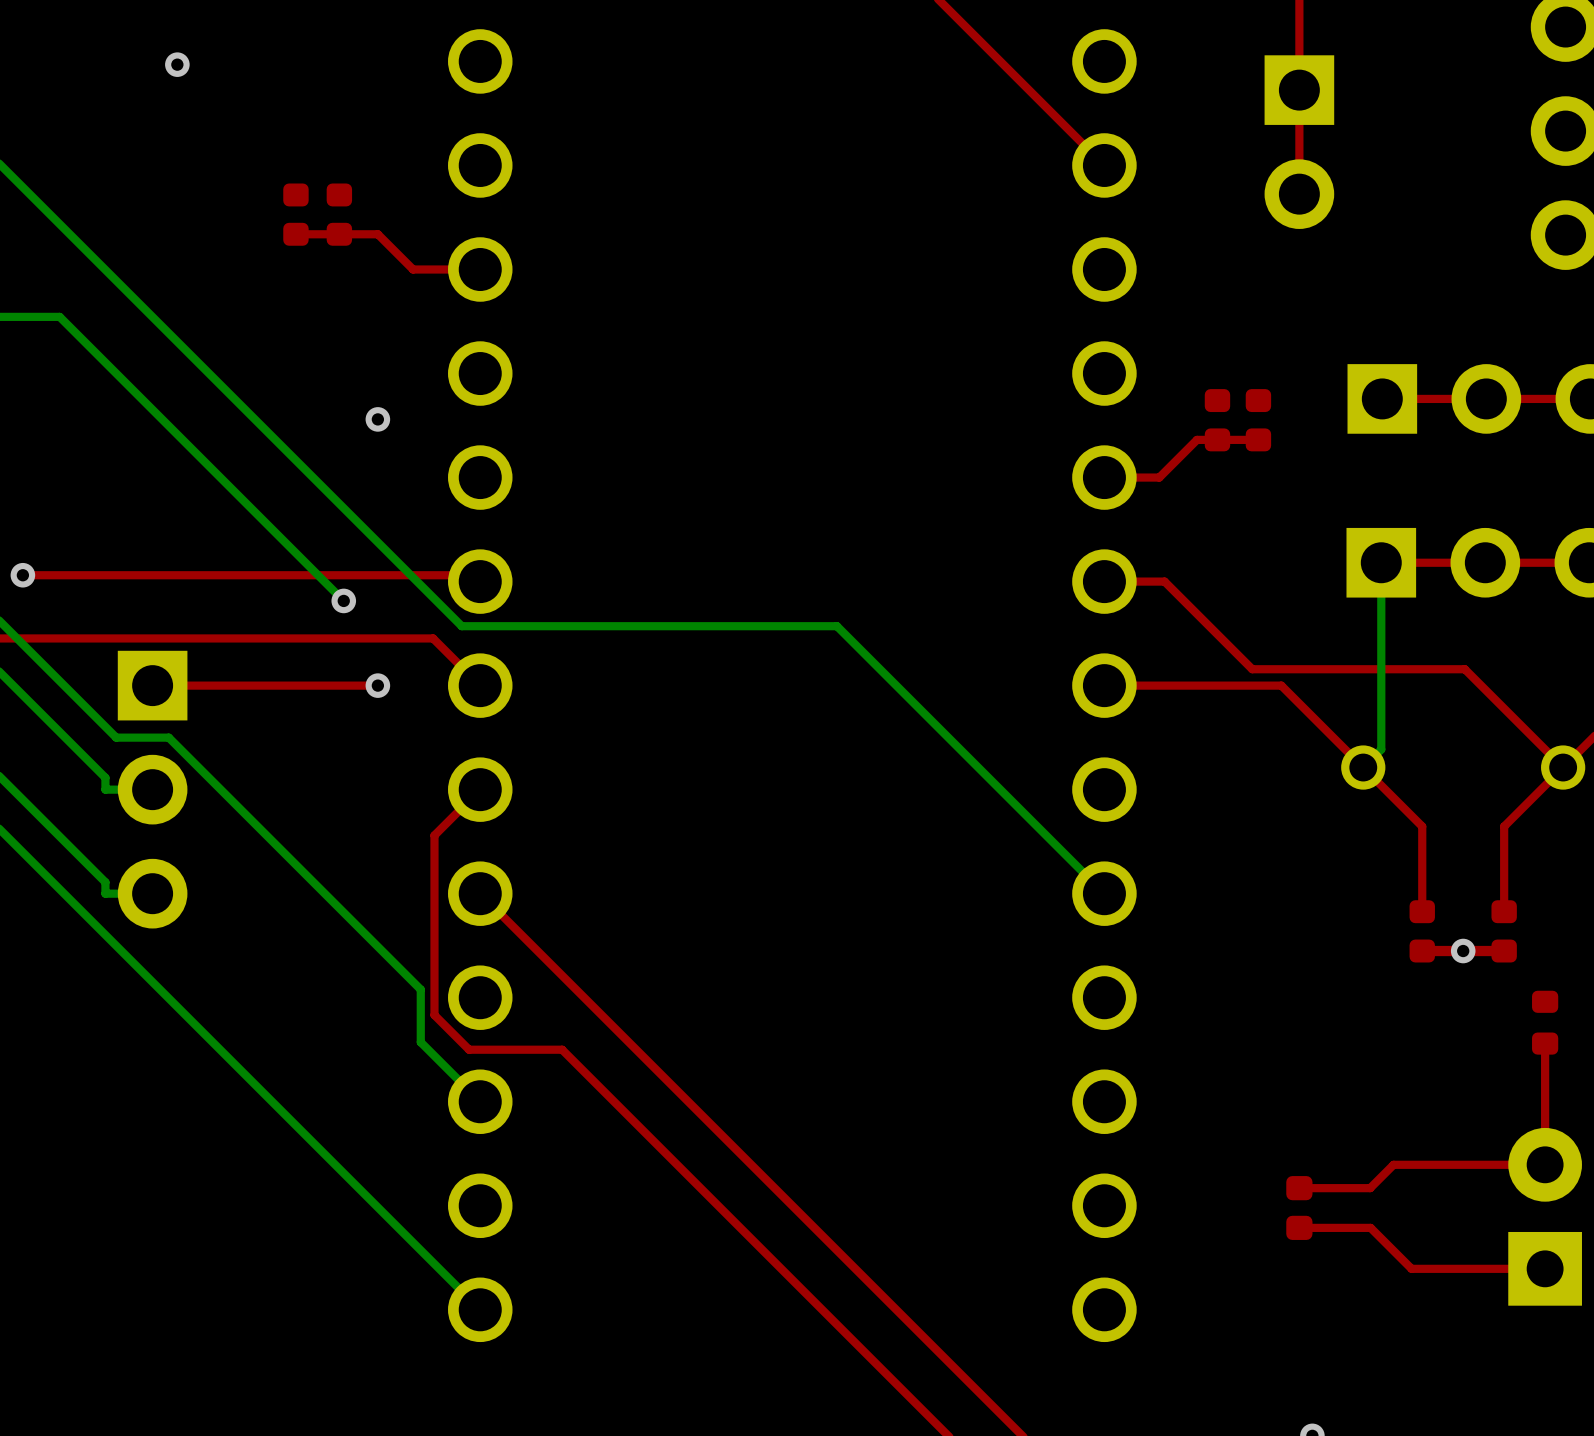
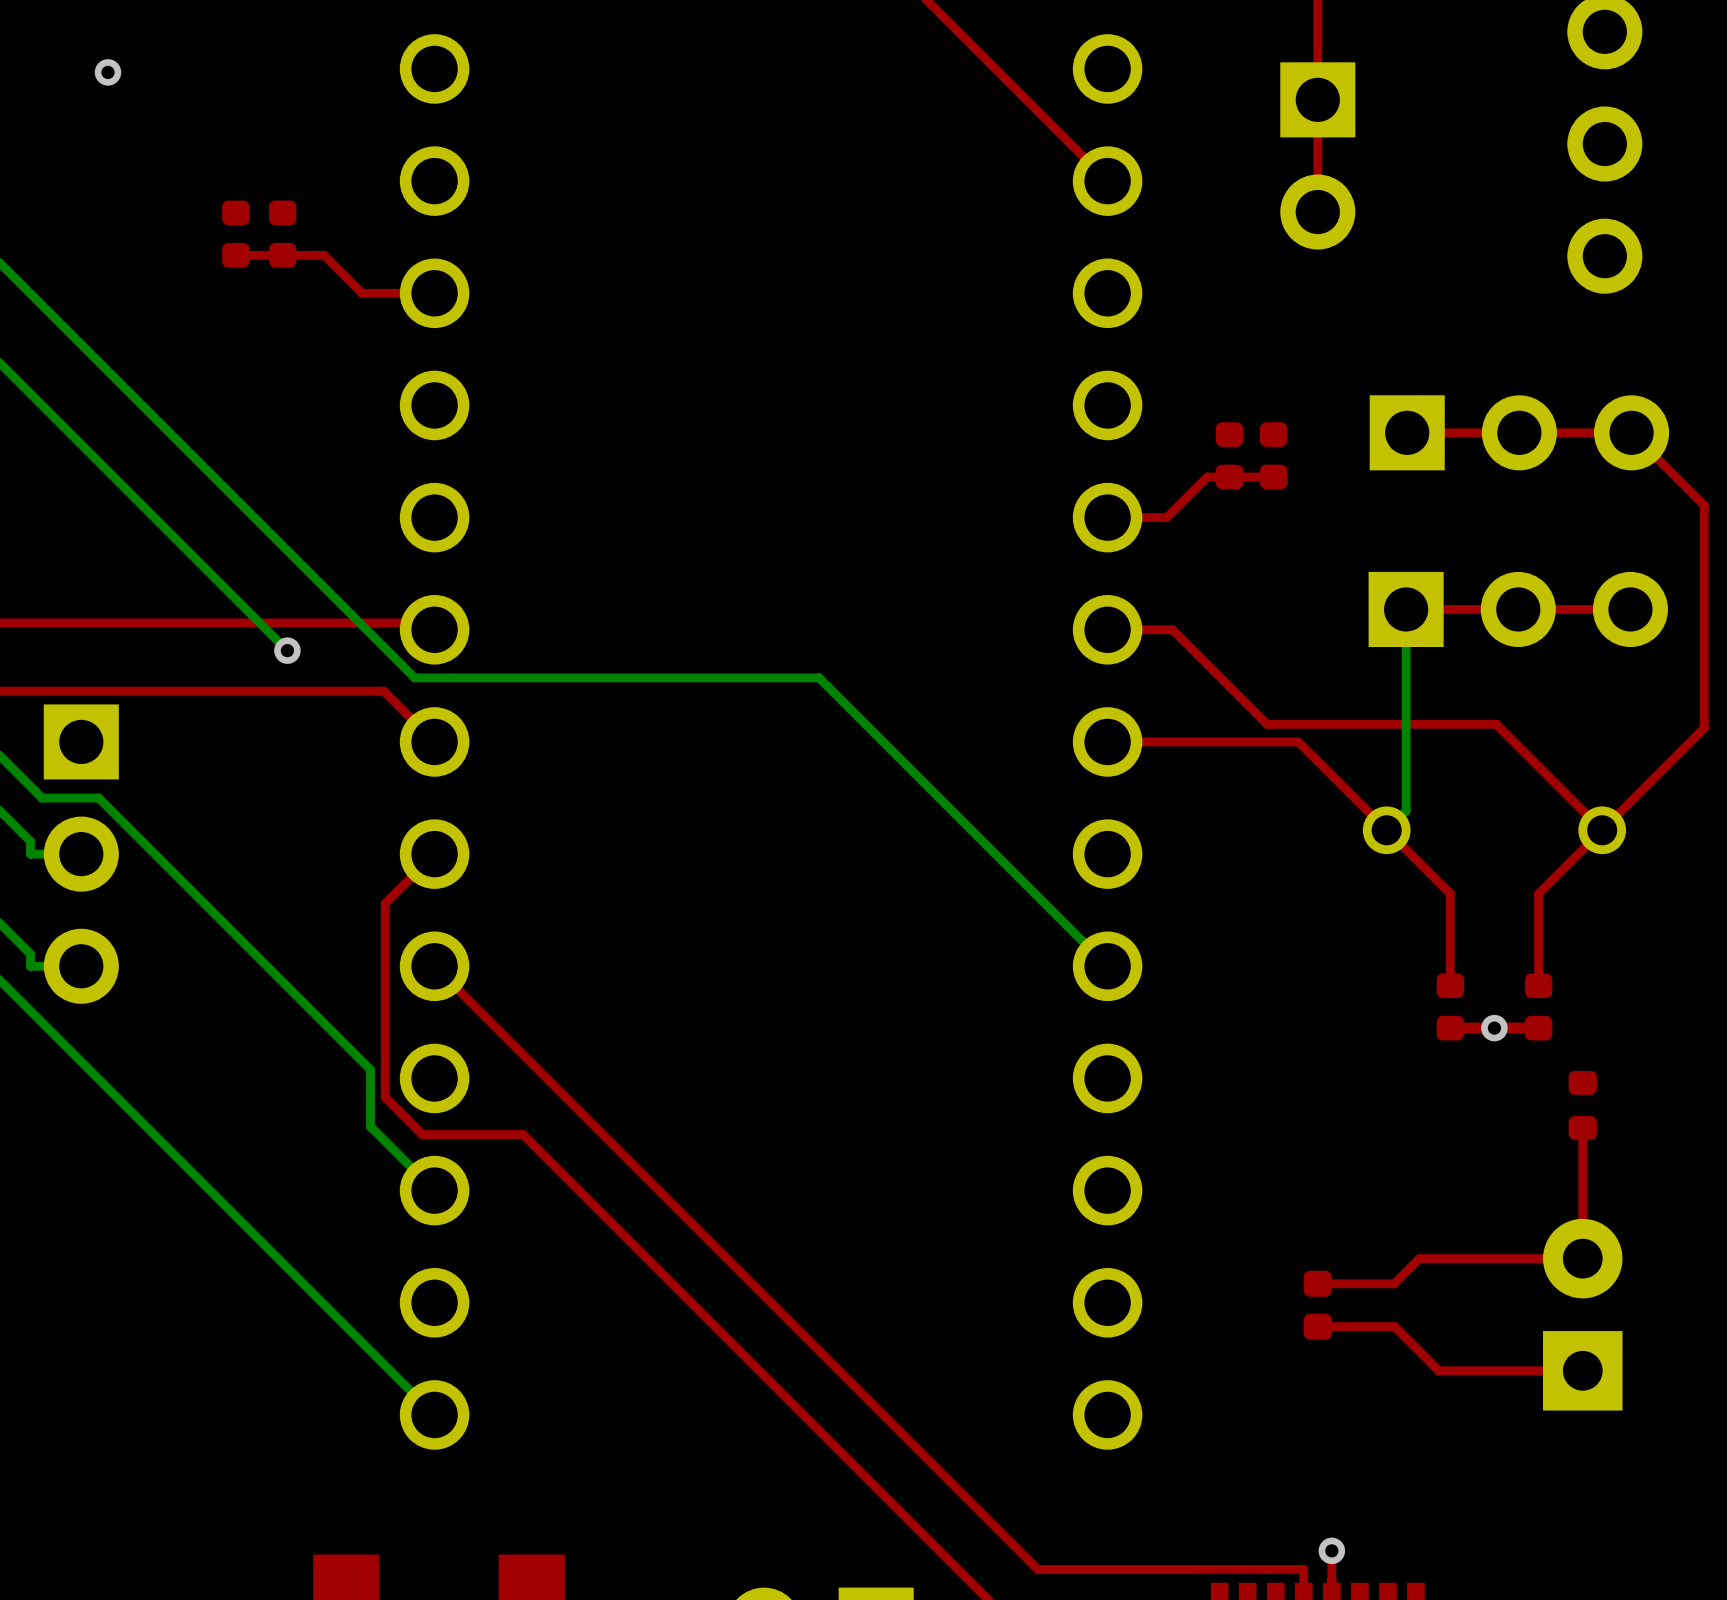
via: (377, 419) -> none
top track: (377, 685) (152, 685) -> none
via: (377, 685) -> none

